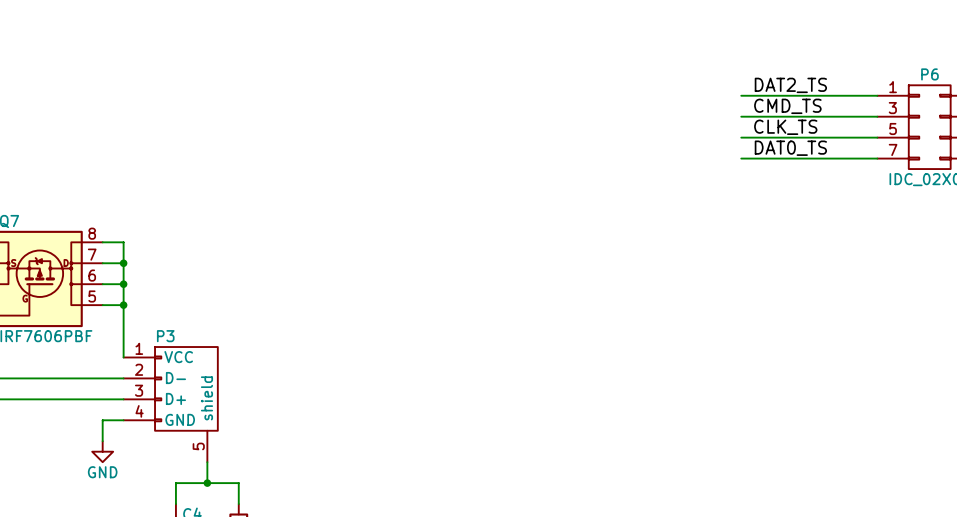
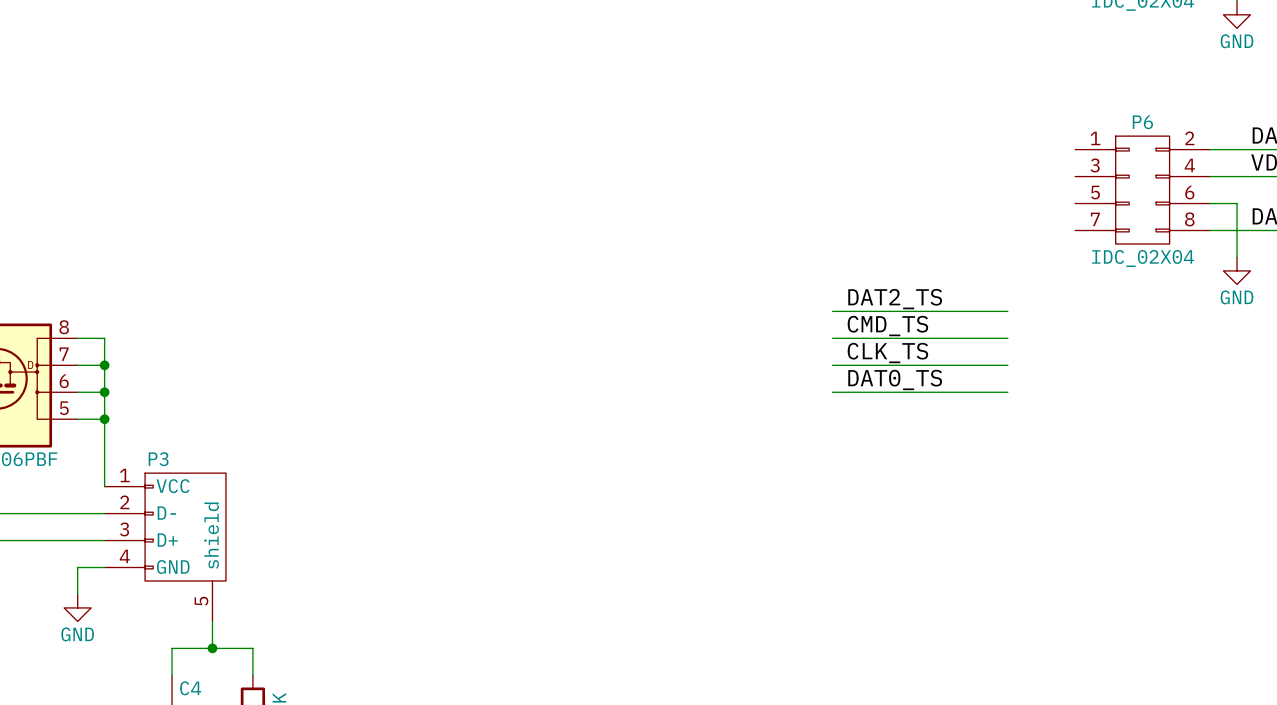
label position: DAT2_TS (790, 85) -> DAT2_TS (895, 299)
wire: (741, 95) (877, 95) -> (832, 311) (1007, 311)
label position: CMD_TS (787, 106) -> CMD_TS (887, 326)
wire: (741, 116) (877, 116) -> (832, 338) (1007, 338)
label position: CLK_TS (785, 127) -> CLK_TS (887, 353)
wire: (741, 137) (877, 137) -> (832, 365) (1007, 365)
label position: DAT0_TS (790, 148) -> DAT0_TS (895, 379)
wire: (741, 158) (877, 158) -> (832, 392) (1007, 392)

